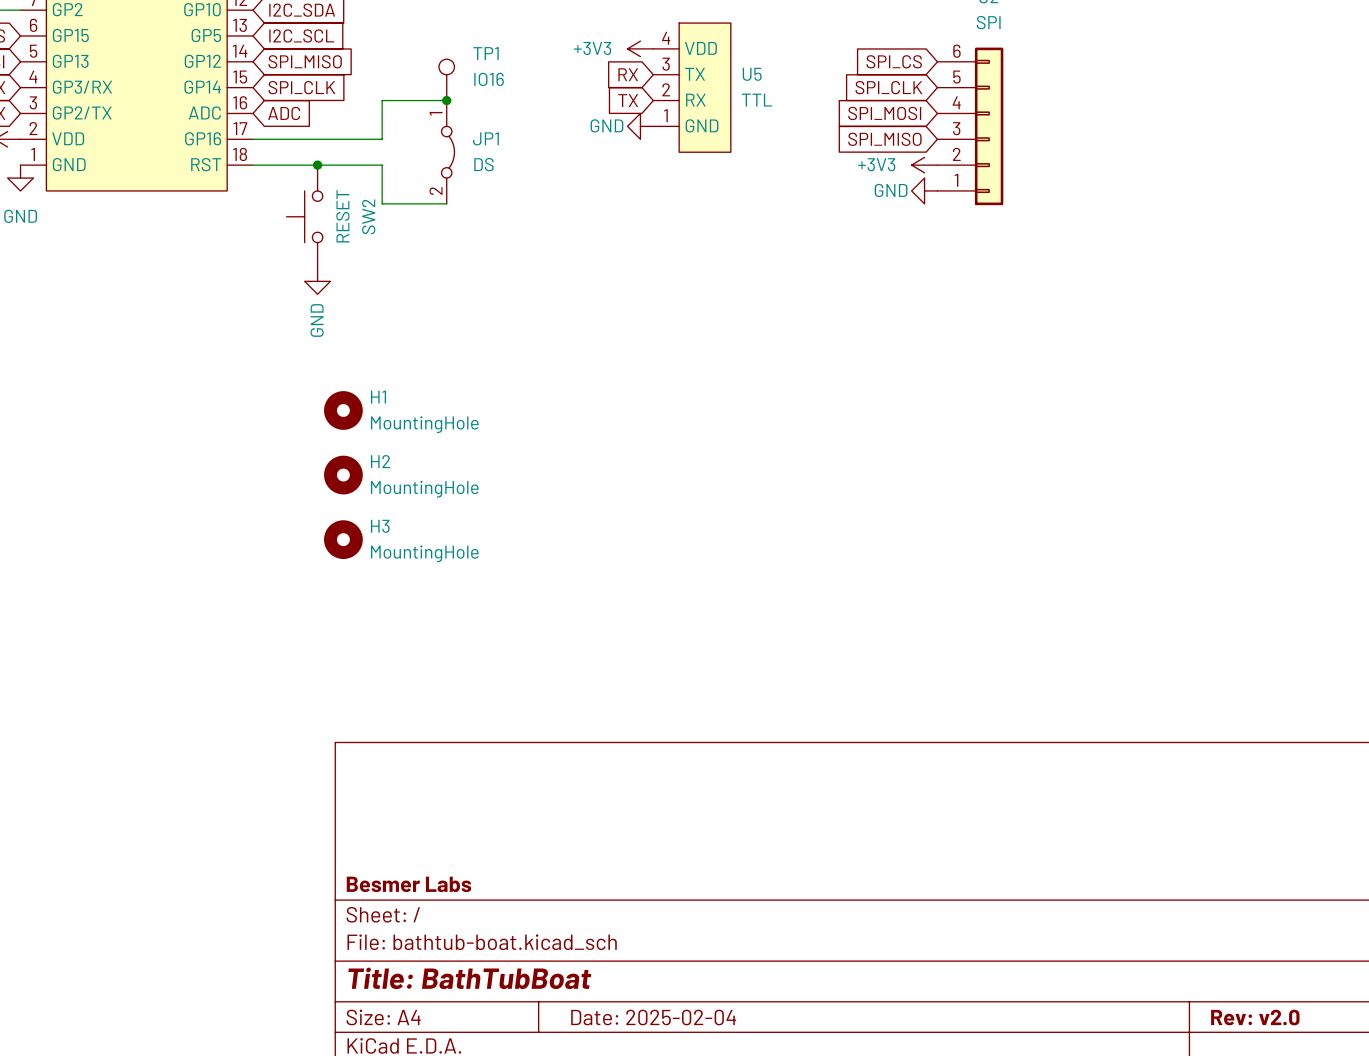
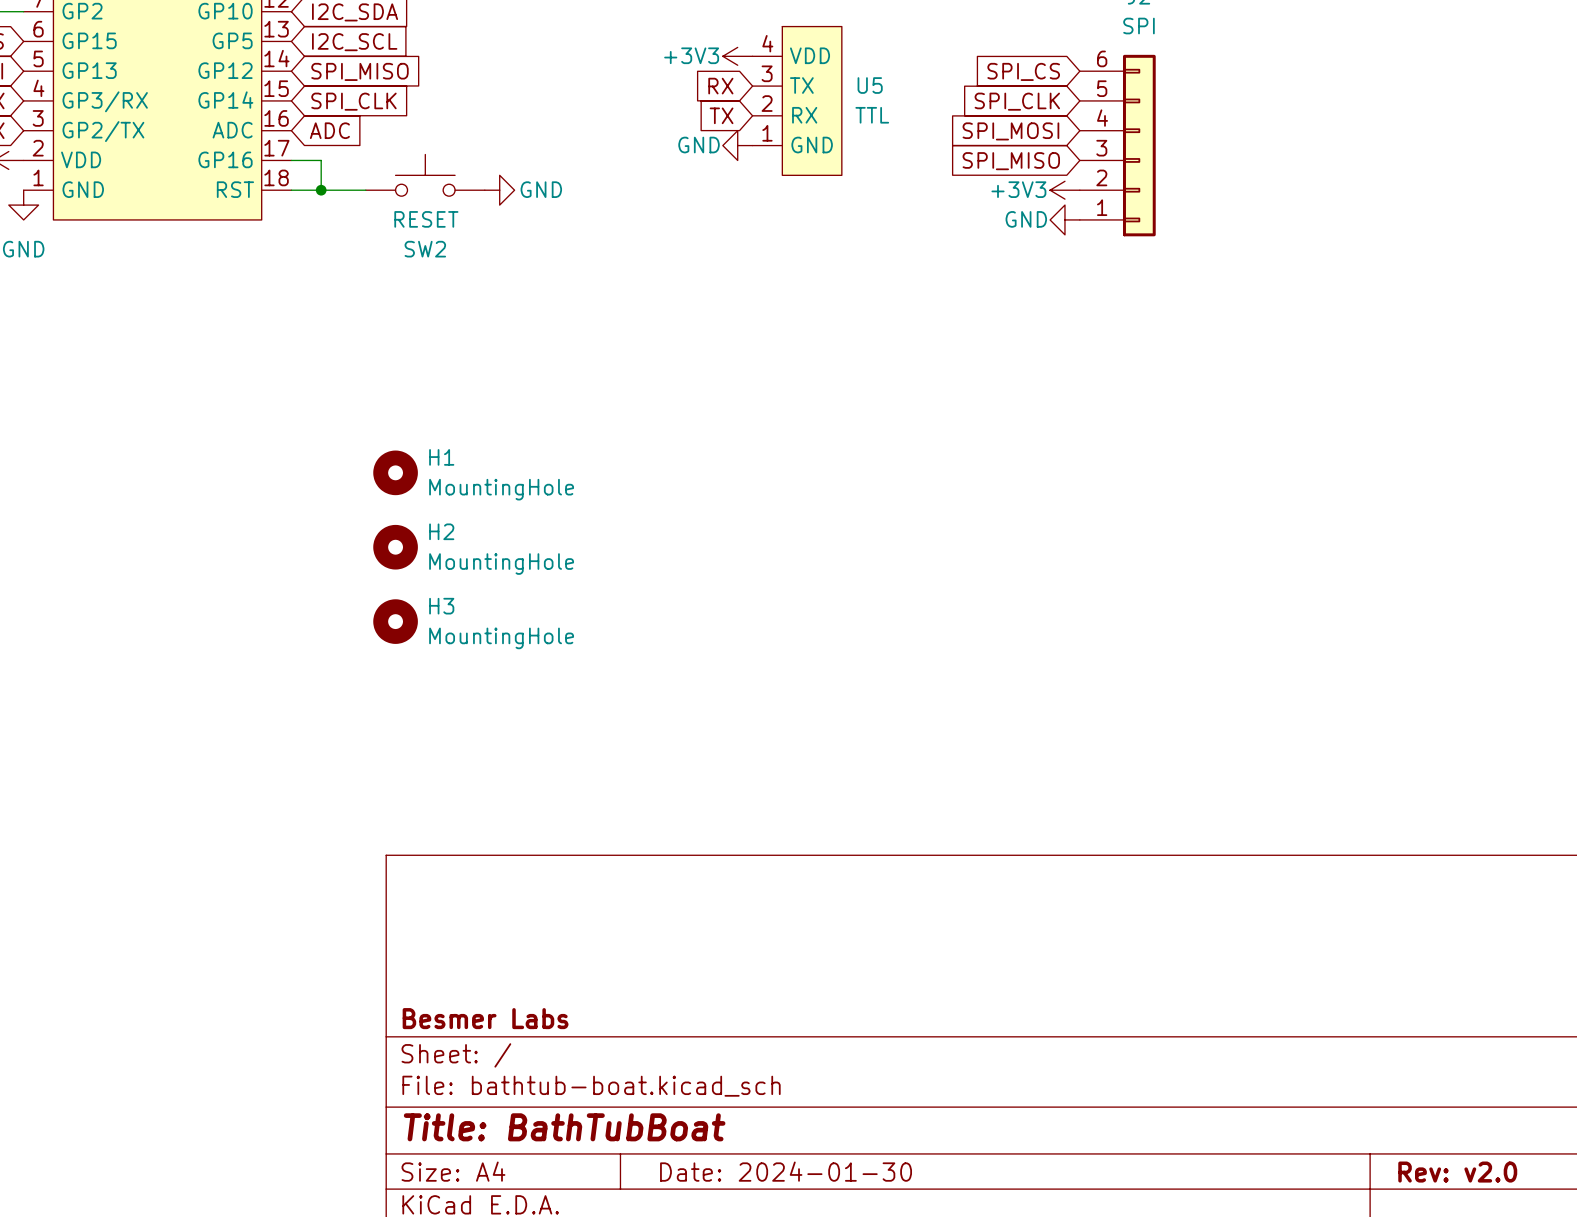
TP1: IO16 (446, 79) -> none
wire: (446, 100) (382, 100) (382, 139) (278, 139) -> (321, 190) (321, 160)
junction: (446, 100) -> none
JP1: DS (448, 152) -> none
wire: (317, 165) (382, 165) (382, 203) (446, 203) -> none
junction position: (317, 165) -> (321, 190)
SW2 rotation: 0° (304, 216) -> 90° clockwise (425, 175)
SW2 position: (304, 216) -> (425, 175)
power symbol rotation: 0° (317, 281) -> 90° counterclockwise (499, 190)
power symbol position: GND (317, 281) -> GND (499, 190)
title block: Date: 2025-02-04 (653, 1017) -> Date: 2024-01-30 (786, 1171)

